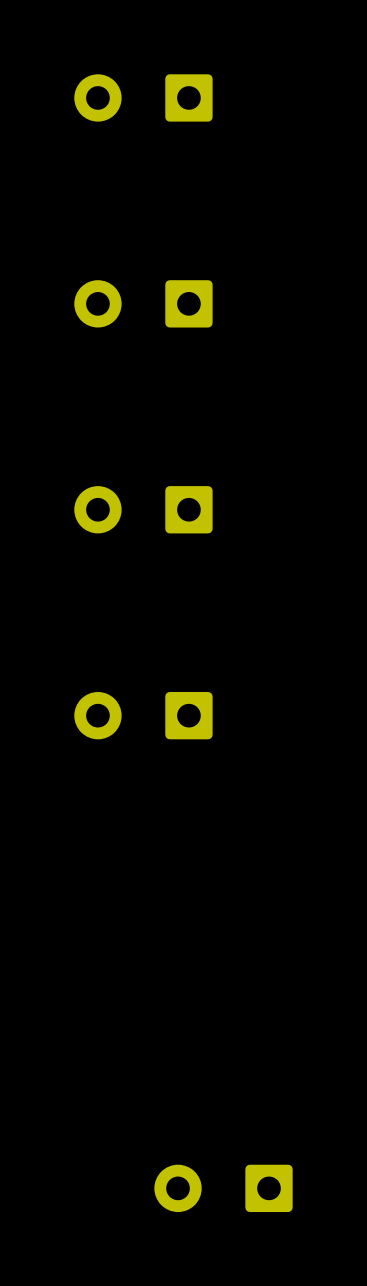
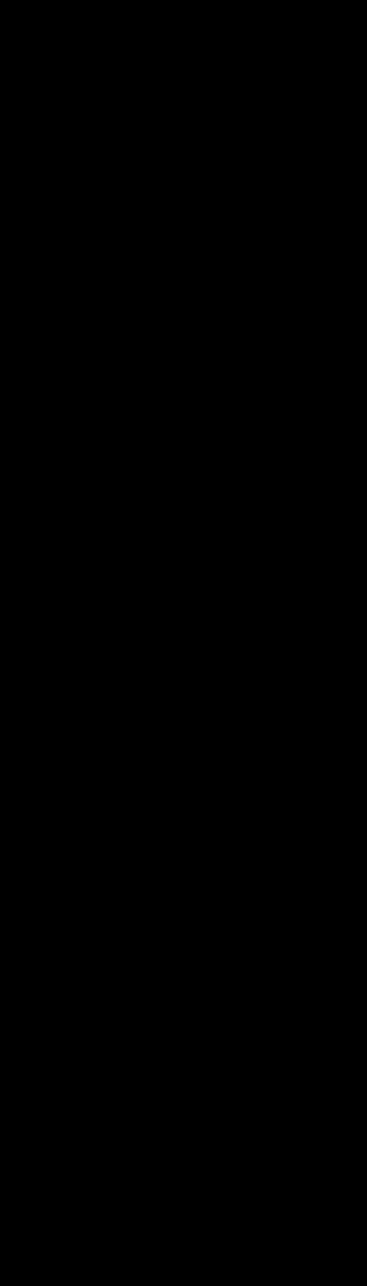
part: (143, 97) -> none
part: (143, 303) -> none
part: (143, 509) -> none
part: (143, 715) -> none
part: (223, 1188) -> none

